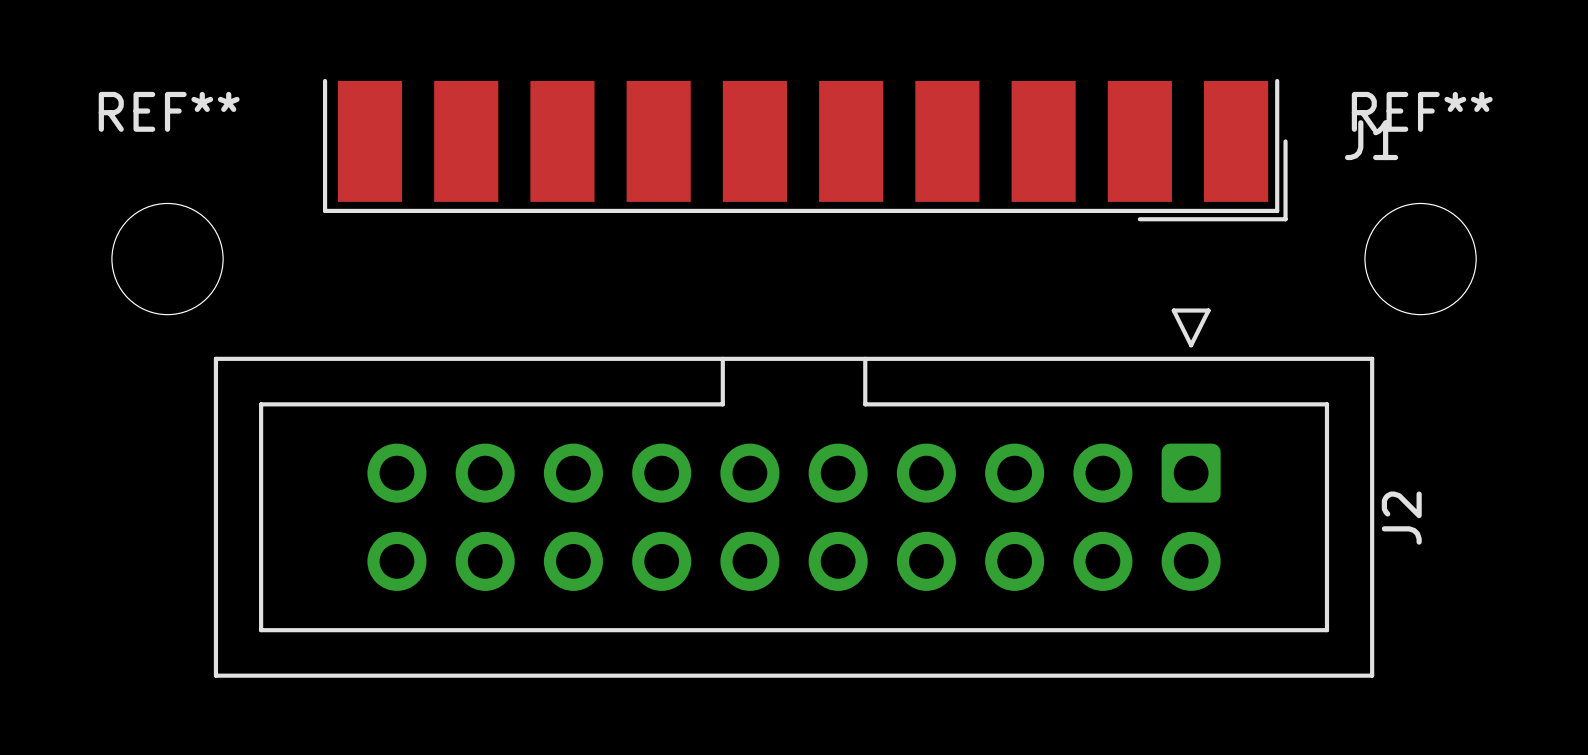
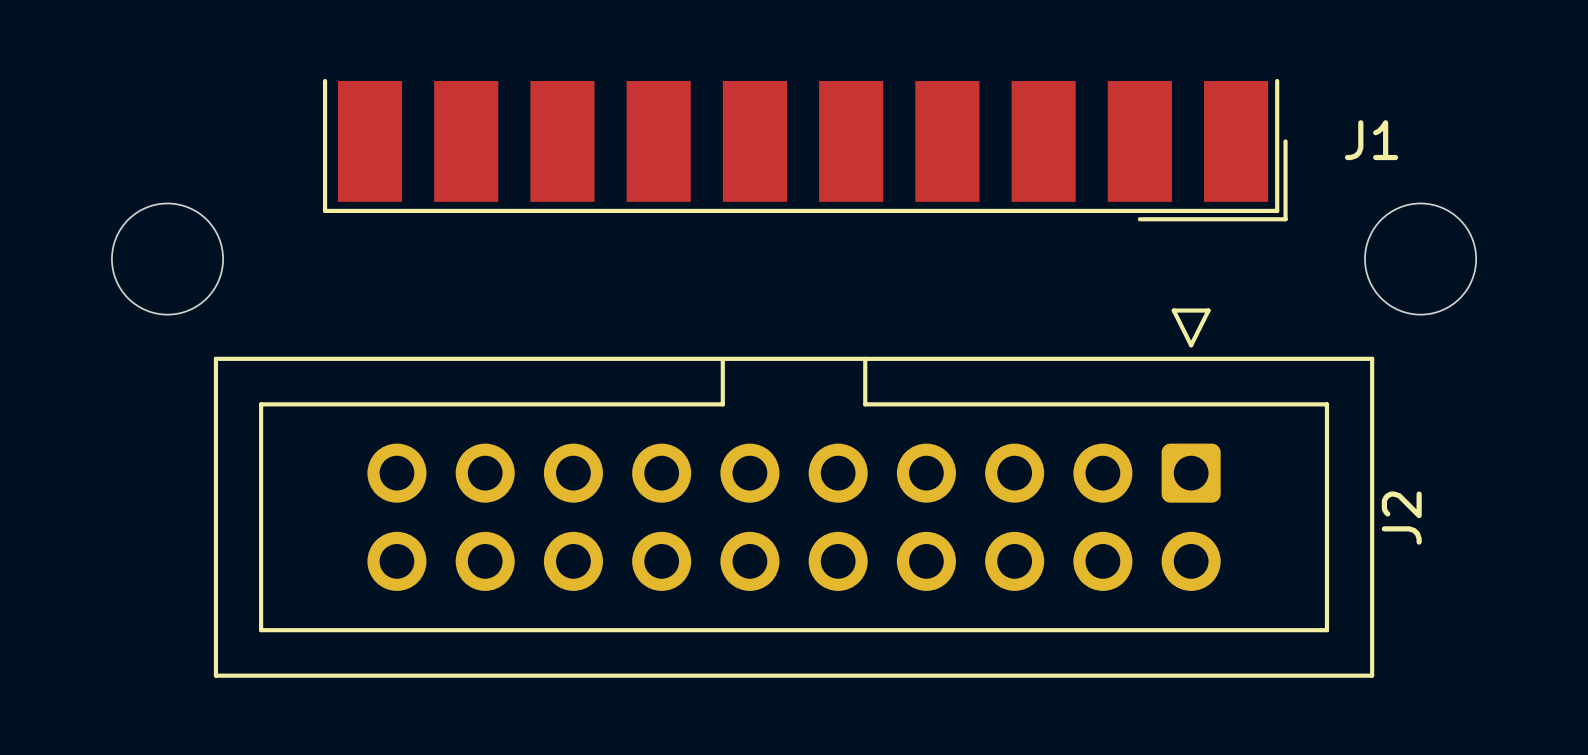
REF** name: REF** (169, 111) -> none
REF** name: REF** (1422, 111) -> none

